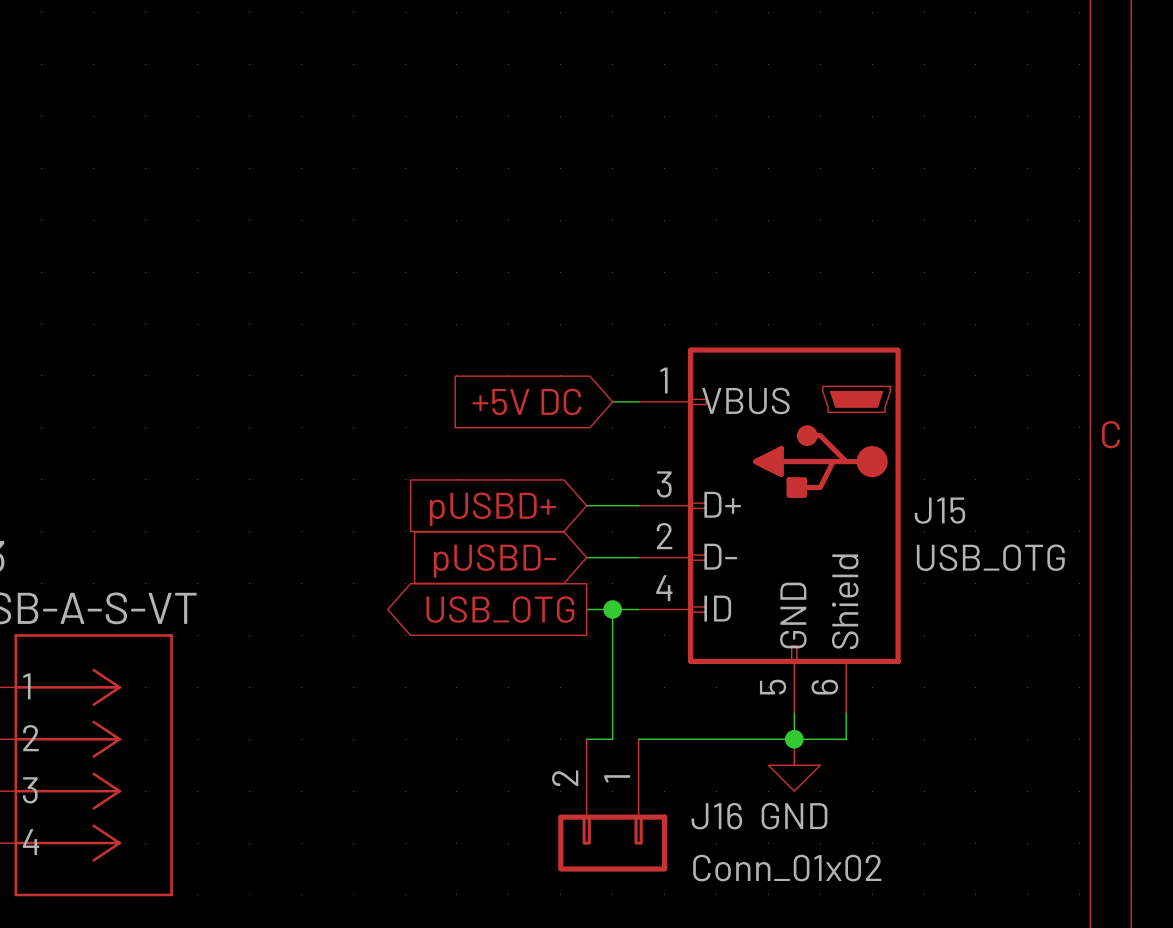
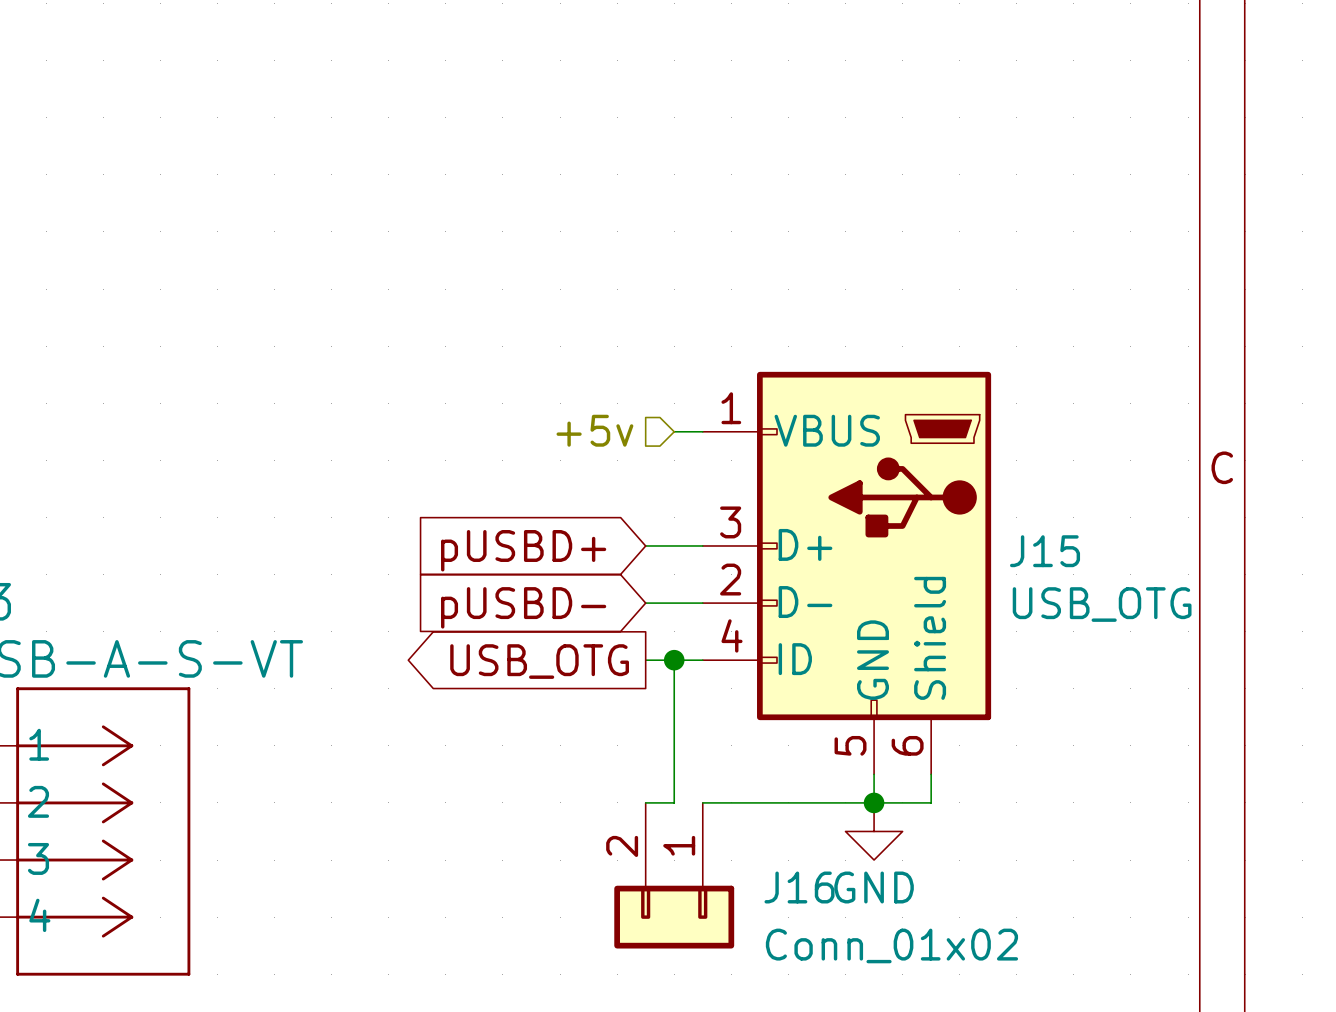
global label: +5V DC (526, 401) -> none
hierarchical label: none -> +5v (594, 430)

